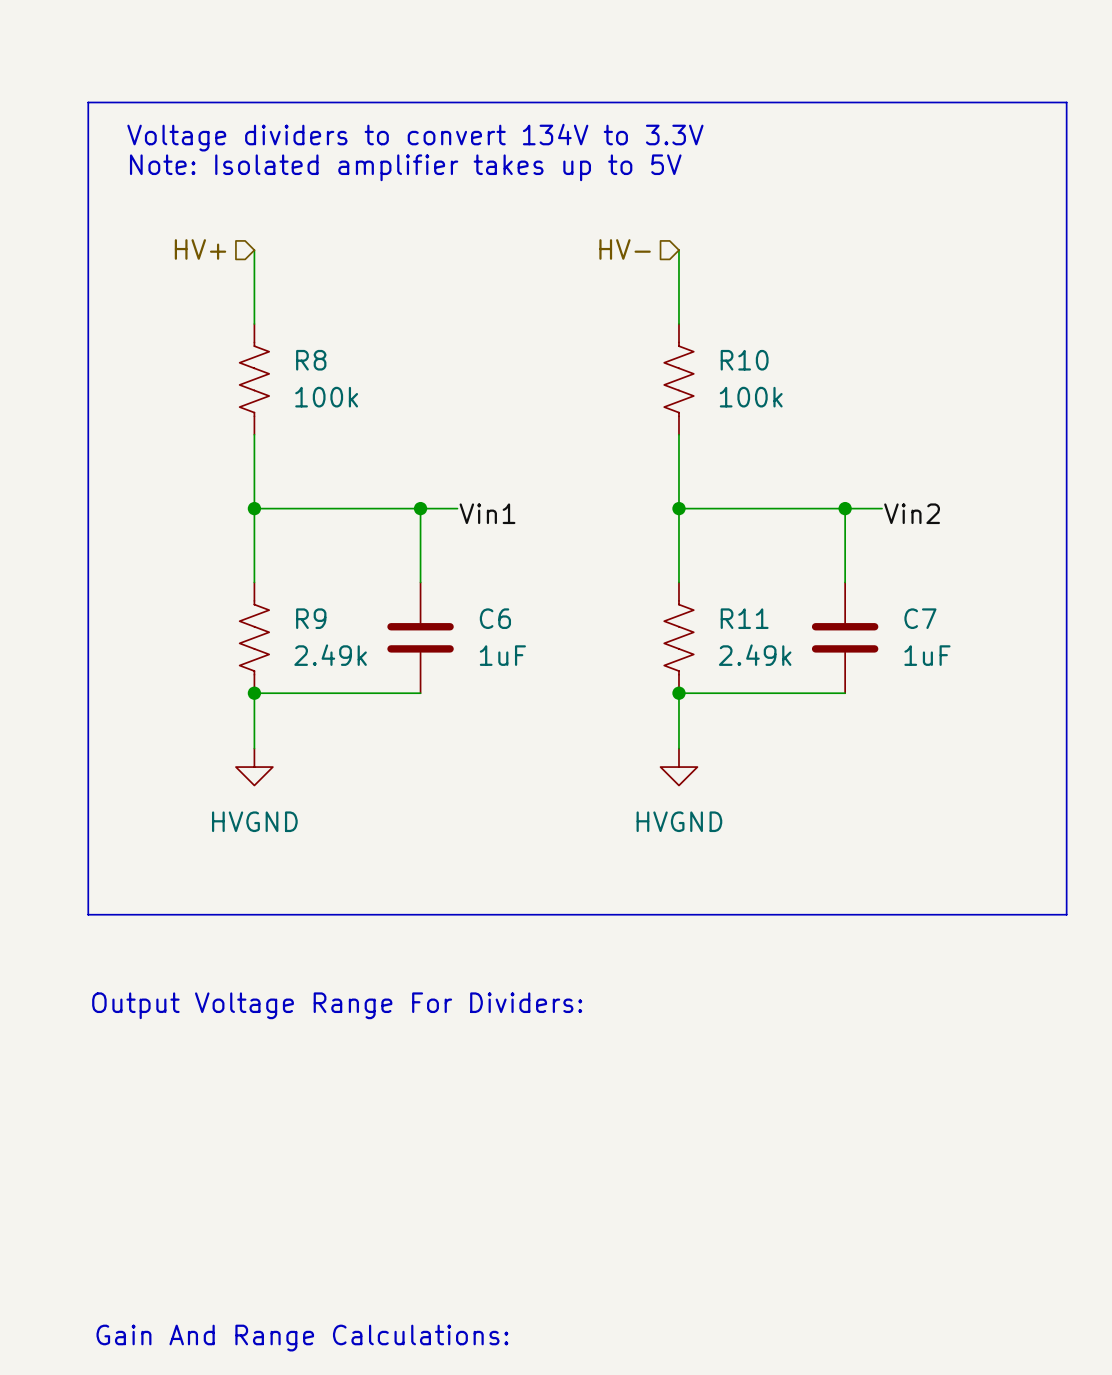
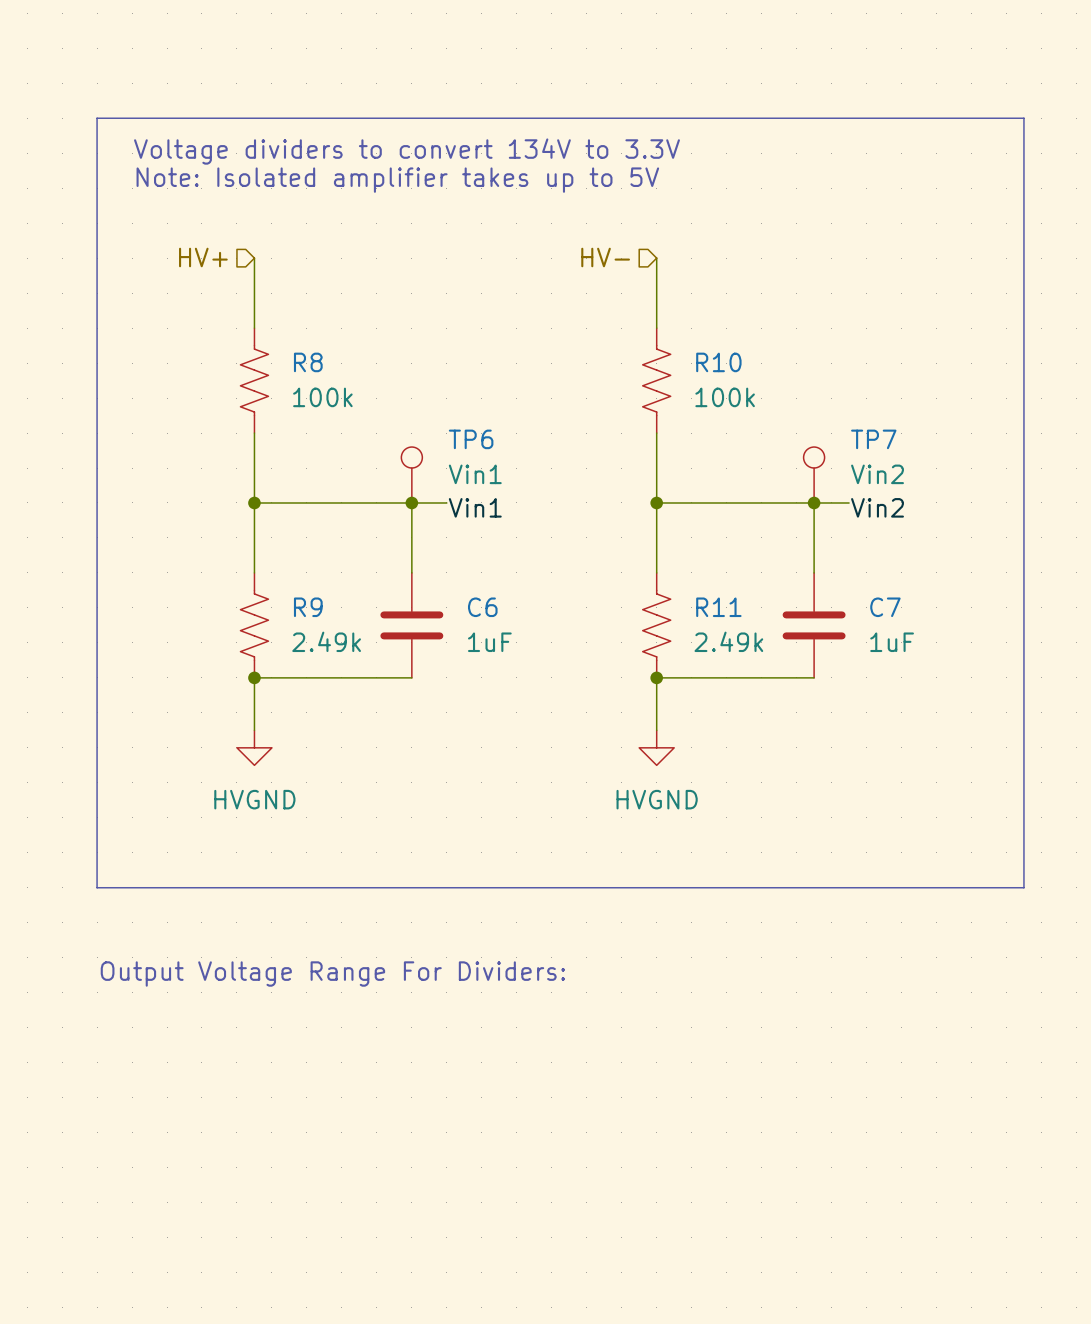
TP6: none -> Vin1 (411, 475)
TP7: none -> Vin2 (814, 475)
text: Gain And Range Calculations: (302, 1338) -> none

